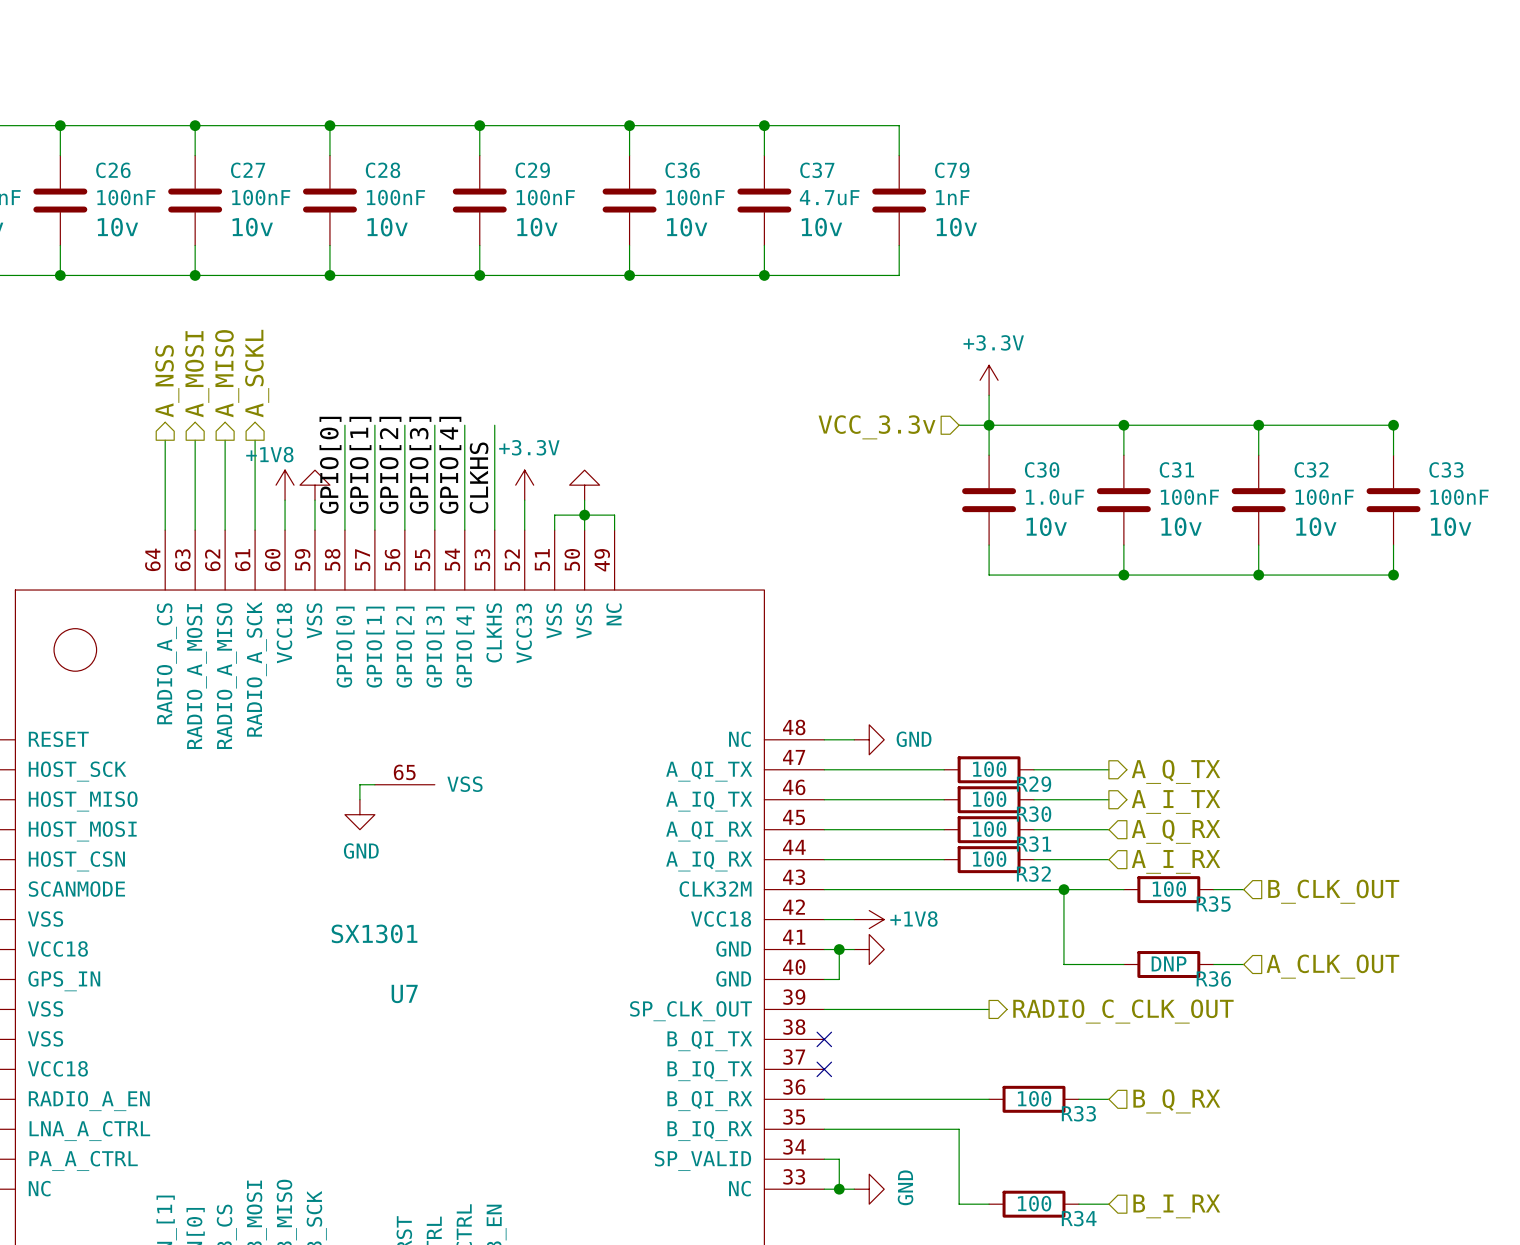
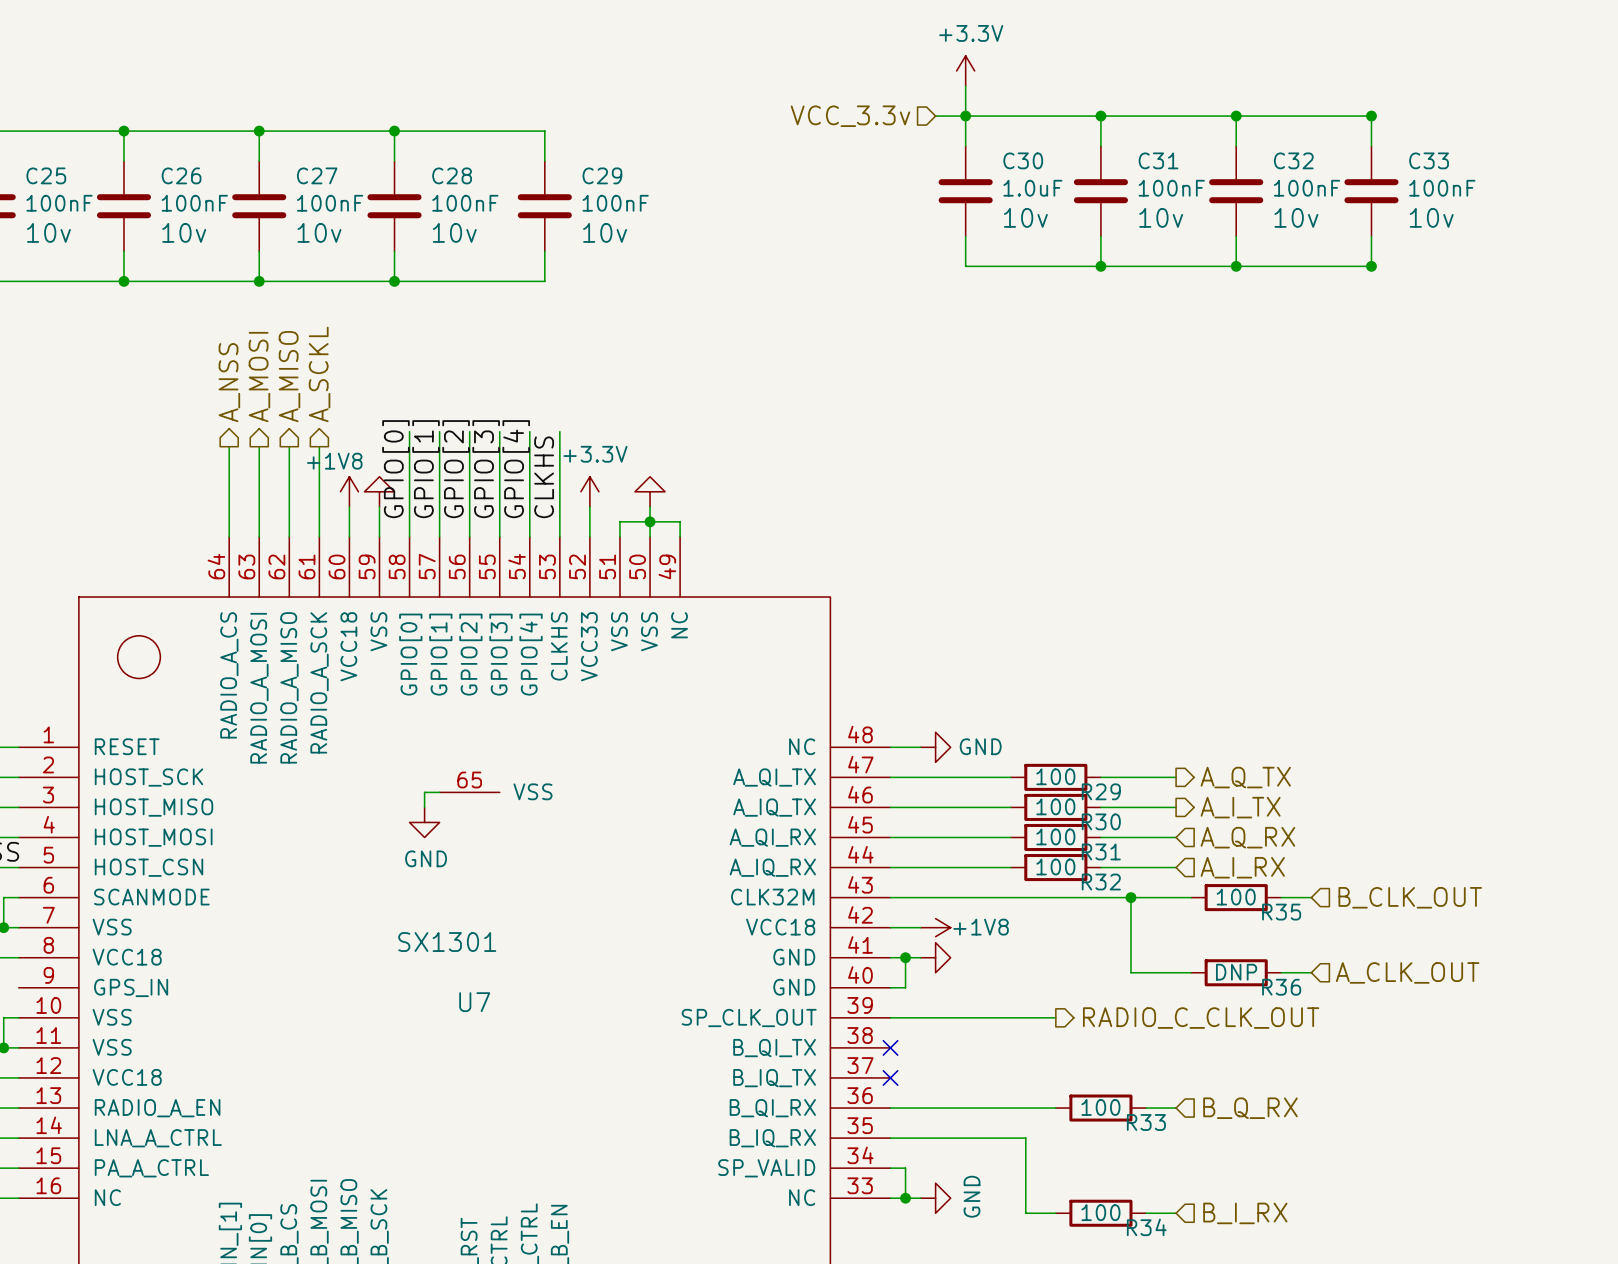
power symbol: none -> +3.3V (965, 70)
wire: none -> (935, 116) (1371, 116) (1371, 146)
junction: none -> (965, 116)
junction: none -> (1100, 116)
wire: none -> (1236, 116) (1236, 146)
junction: none -> (1236, 116)
junction: none -> (1371, 116)
hierarchical label: none -> VCC_3.3v (850, 116)
wire: (479, 125) (899, 125) -> (965, 85) (965, 131)
junction: (479, 125) -> none
wire: (629, 125) (629, 155) -> none
junction: (629, 125) -> none
wire: (764, 125) (764, 155) -> (1100, 116) (1100, 146)
junction: (764, 125) -> none
C36: 100nF (629, 200) -> none
C37: 4.7uF (764, 200) -> none
C79: 1nF (899, 200) -> none
wire: (629, 245) (629, 275) -> none
wire: (764, 245) (764, 275) -> none
wire: (899, 260) (899, 275) (479, 275) -> (965, 266) (1371, 266) (1371, 236)
junction: none -> (1100, 266)
junction: none -> (1236, 266)
junction: none -> (1371, 266)
junction: (479, 275) -> none
junction: (629, 275) -> none
junction: (764, 275) -> none
power symbol: +3.3V (989, 380) -> none
wire: (989, 395) (989, 455) -> none
wire: (959, 425) (1393, 425) (1393, 455) -> none
junction: (989, 425) -> none
wire: (1123, 425) (1123, 455) -> (1100, 236) (1100, 266)
junction: (1123, 425) -> none
wire: (1258, 425) (1258, 455) -> (1236, 236) (1236, 266)
junction: (1258, 425) -> none
junction: (1393, 425) -> none
hierarchical label: VCC_3.3v (877, 427) -> none
C30 position: (989, 500) -> (965, 191)
C31 position: (1123, 500) -> (1100, 191)
C32 position: (1258, 500) -> (1236, 191)
C33 position: (1393, 500) -> (1371, 191)
wire: (989, 545) (989, 575) (1393, 575) (1393, 545) -> none
wire: (1123, 545) (1123, 575) -> none
wire: (1258, 545) (1258, 575) -> none
junction: (1123, 575) -> none
junction: (1258, 575) -> none
junction: (1393, 575) -> none

